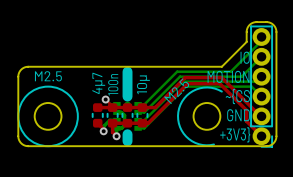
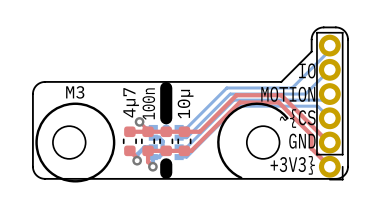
part value: M2.5 (48, 76) -> M3 (75, 92)
drawing shape: [17, 85, 79, 148] -> [35, 102, 116, 183]
part value: M2.5 (176, 91) -> none
line: (221, 91) (207, 87) (192, 91) (184, 98) (178, 112) (180, 127) (186, 136) (198, 144) (213, 144) -> none
line: none -> (287, 118) (276, 108) (256, 103) (242, 106) (226, 118) (219, 132) (219, 151) (225, 165) (241, 177)

